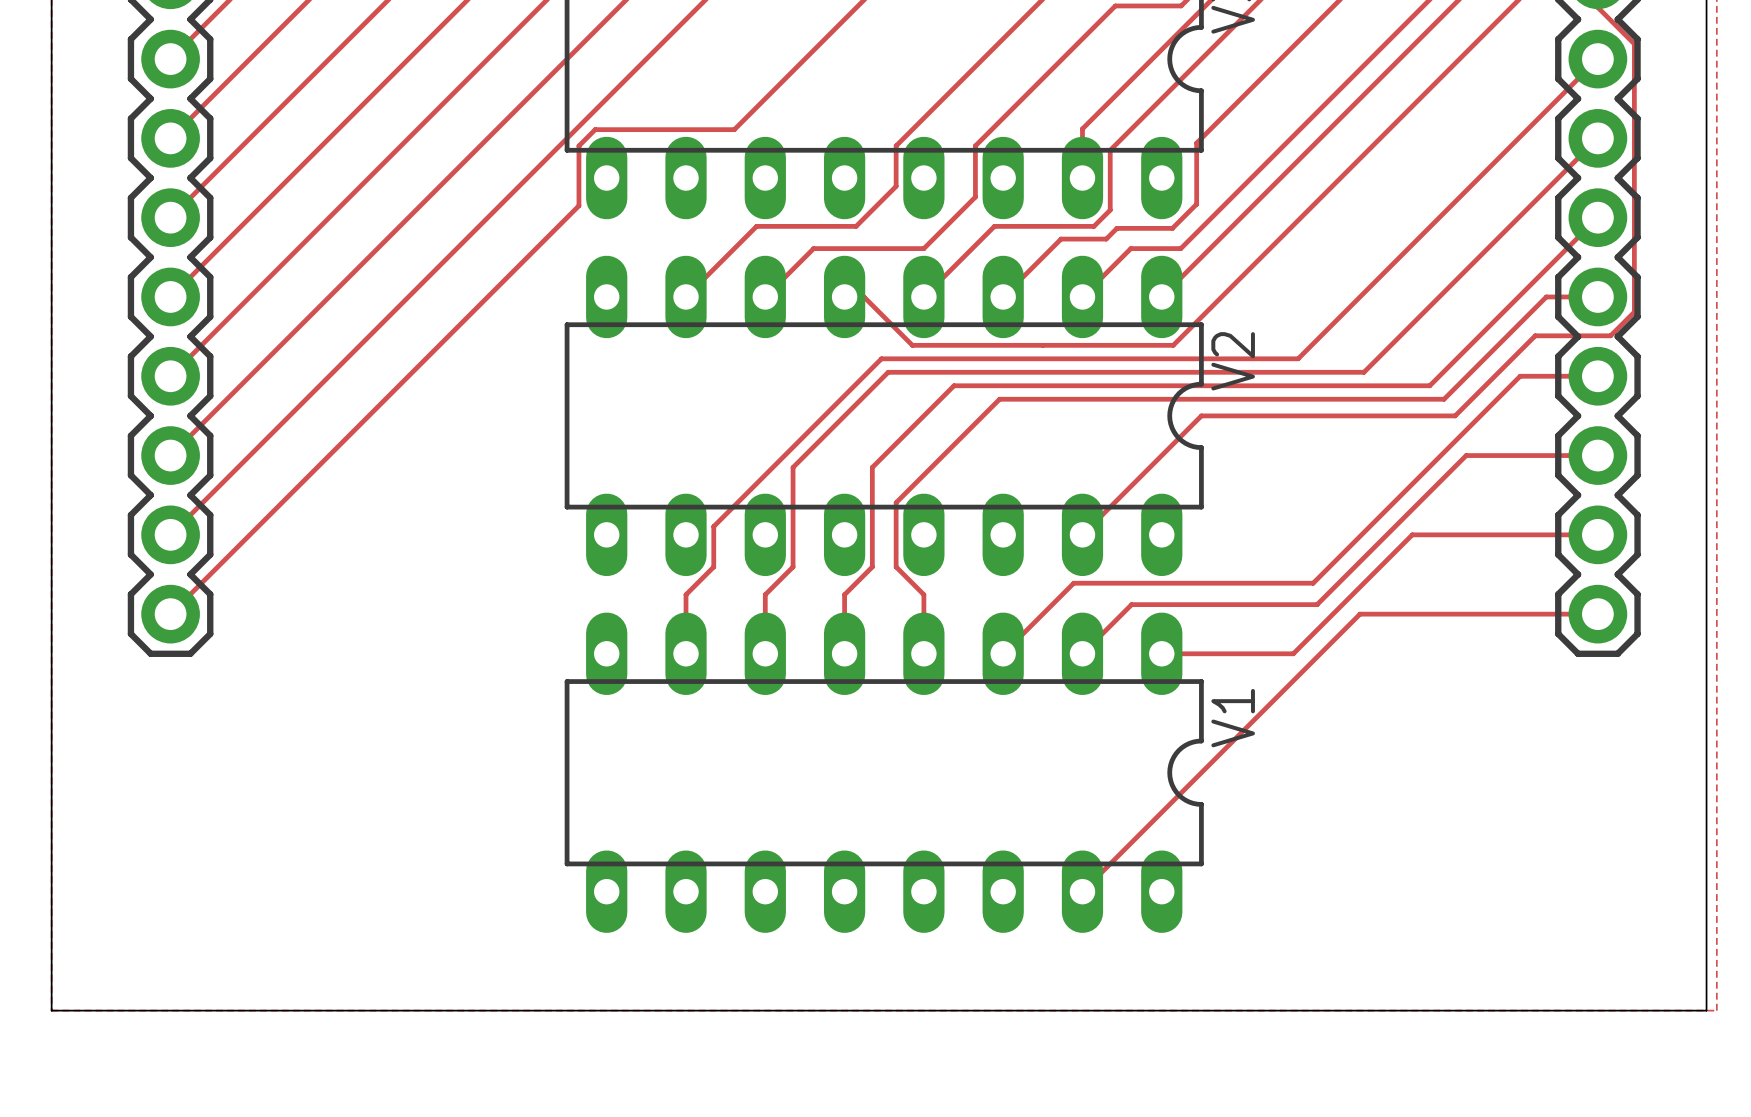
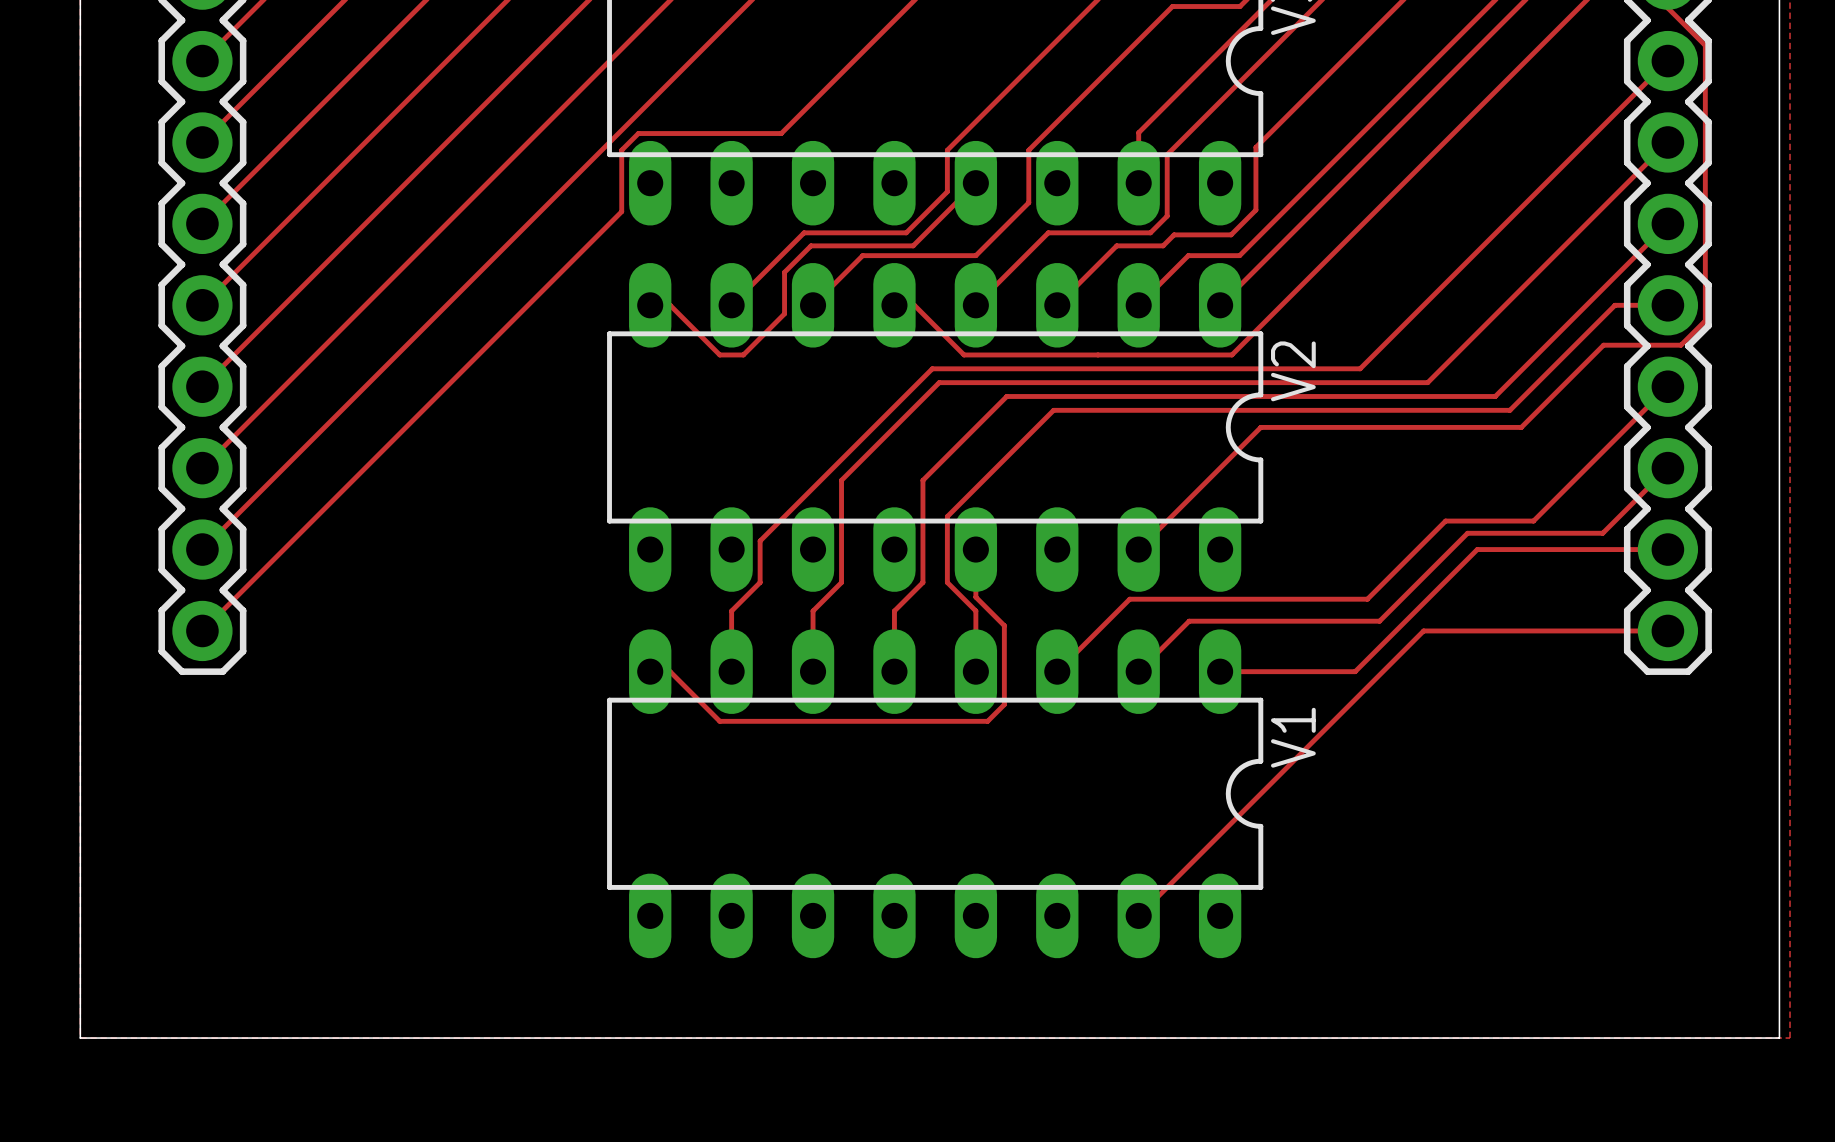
track: none -> (975, 183) (913, 245) (811, 245) (784, 272) (784, 313) (743, 354) (719, 354) (670, 305) (650, 305)
track: (1597, 376) (1520, 376) (1313, 583) (1305, 583) -> (1667, 386) (1533, 521) (1445, 521) (1367, 599)
track: (1597, 455) (1466, 455) (1402, 518) -> (1667, 468) (1602, 533) (1467, 533)
track: none -> (975, 549) (975, 597) (1004, 625) (1004, 704) (987, 721) (719, 721) (670, 671) (650, 671)

